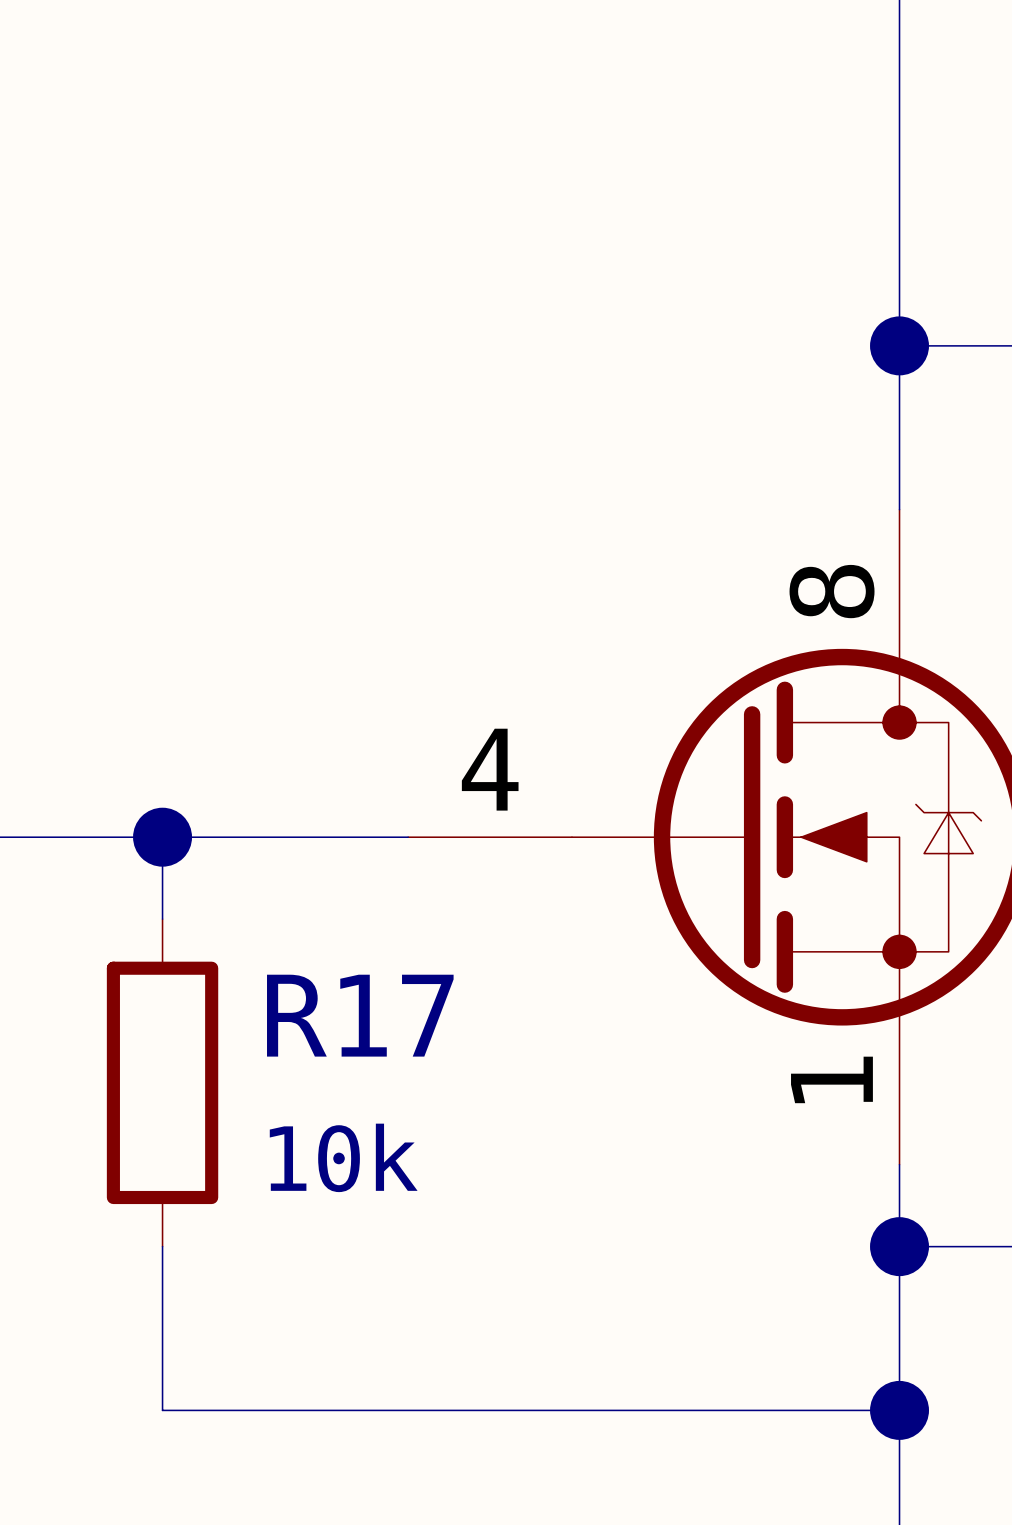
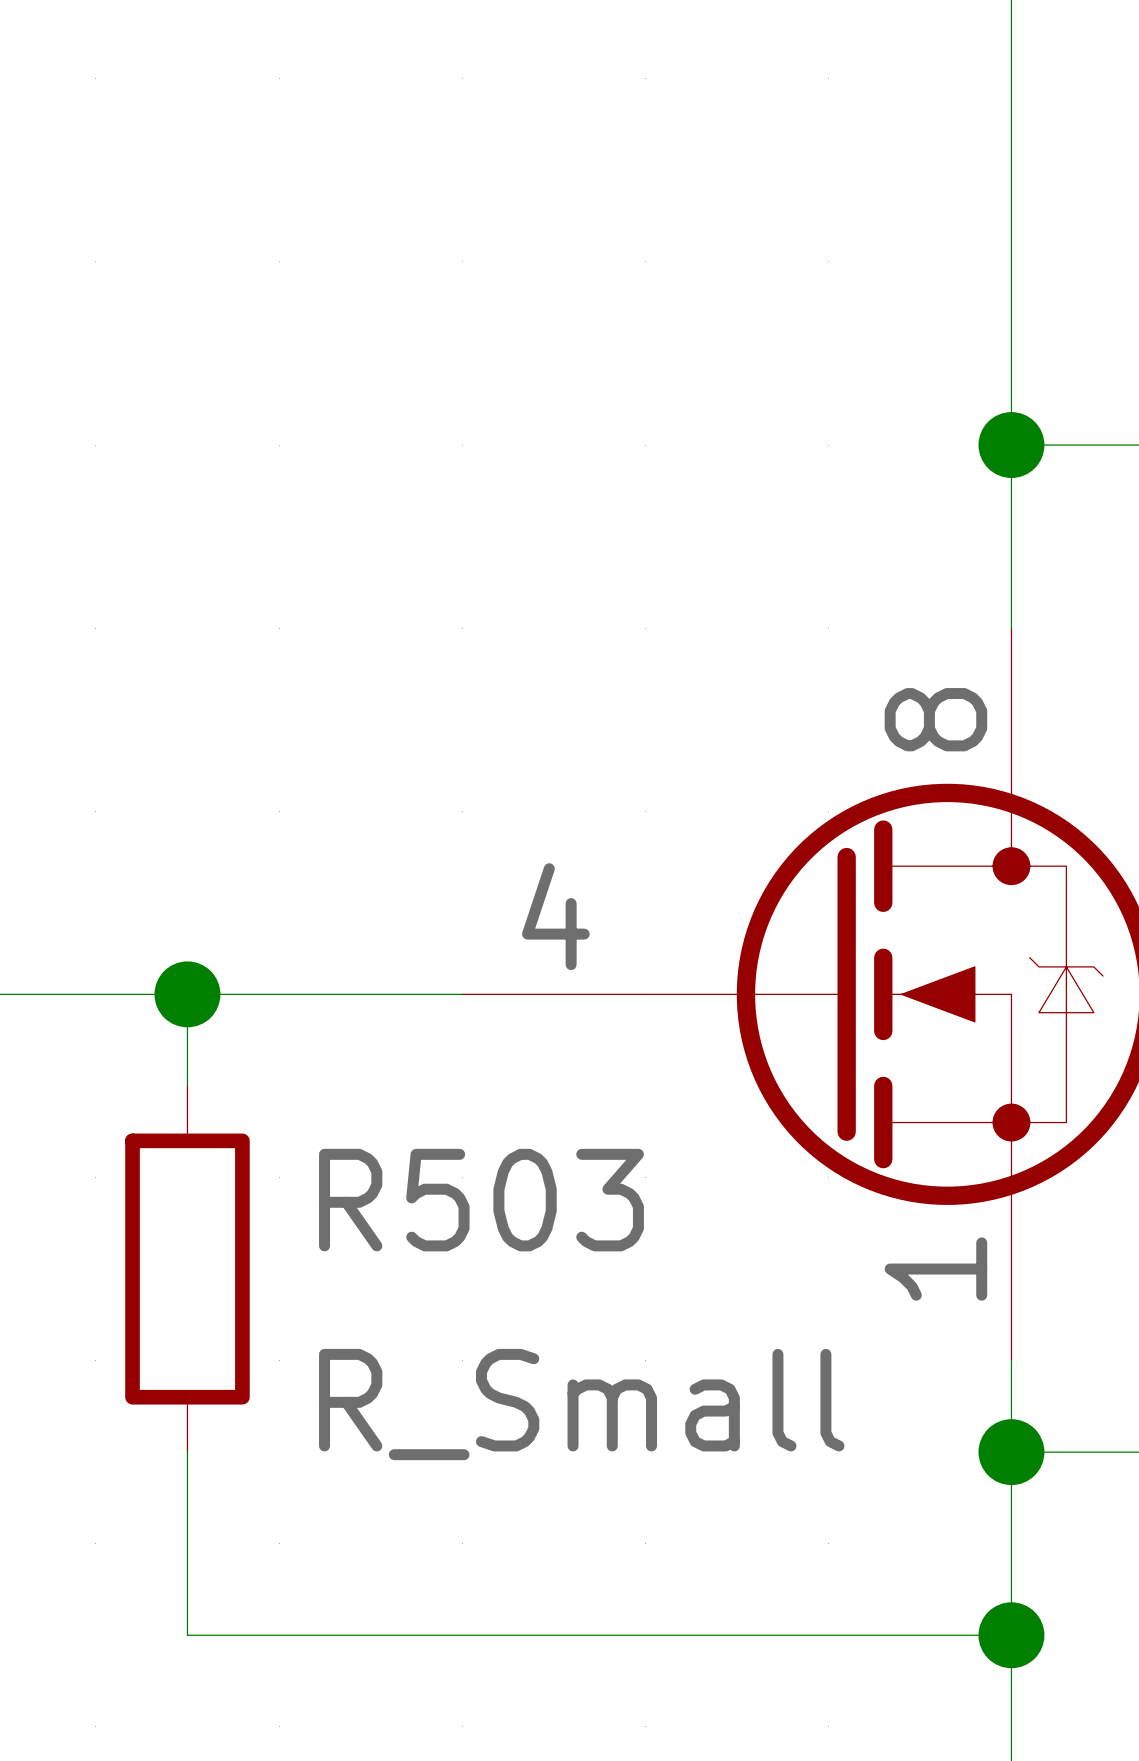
R17 name: R17 (360, 1015) -> R503 (481, 1200)
R17 value: 10k (343, 1157) -> R_Small (581, 1404)

